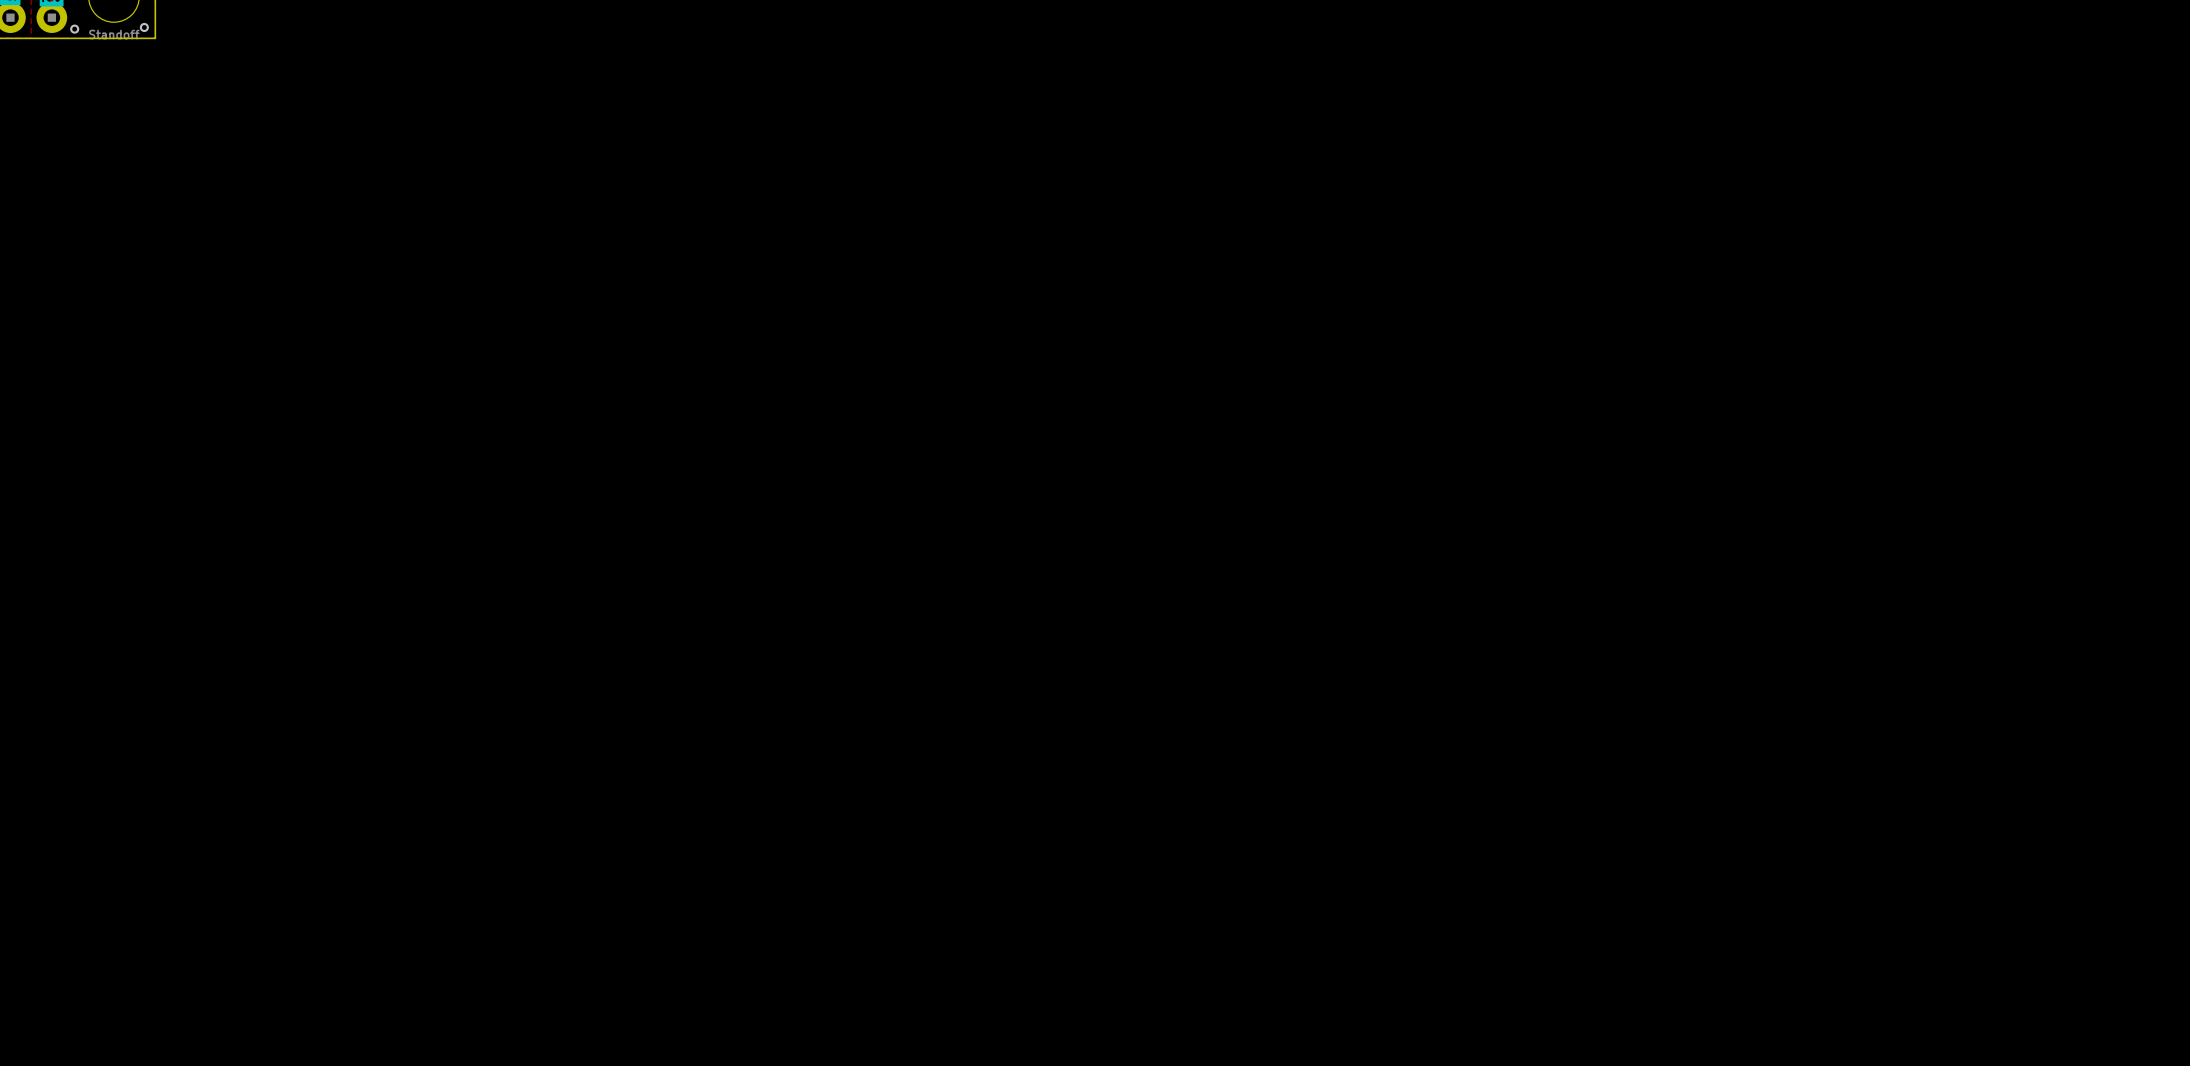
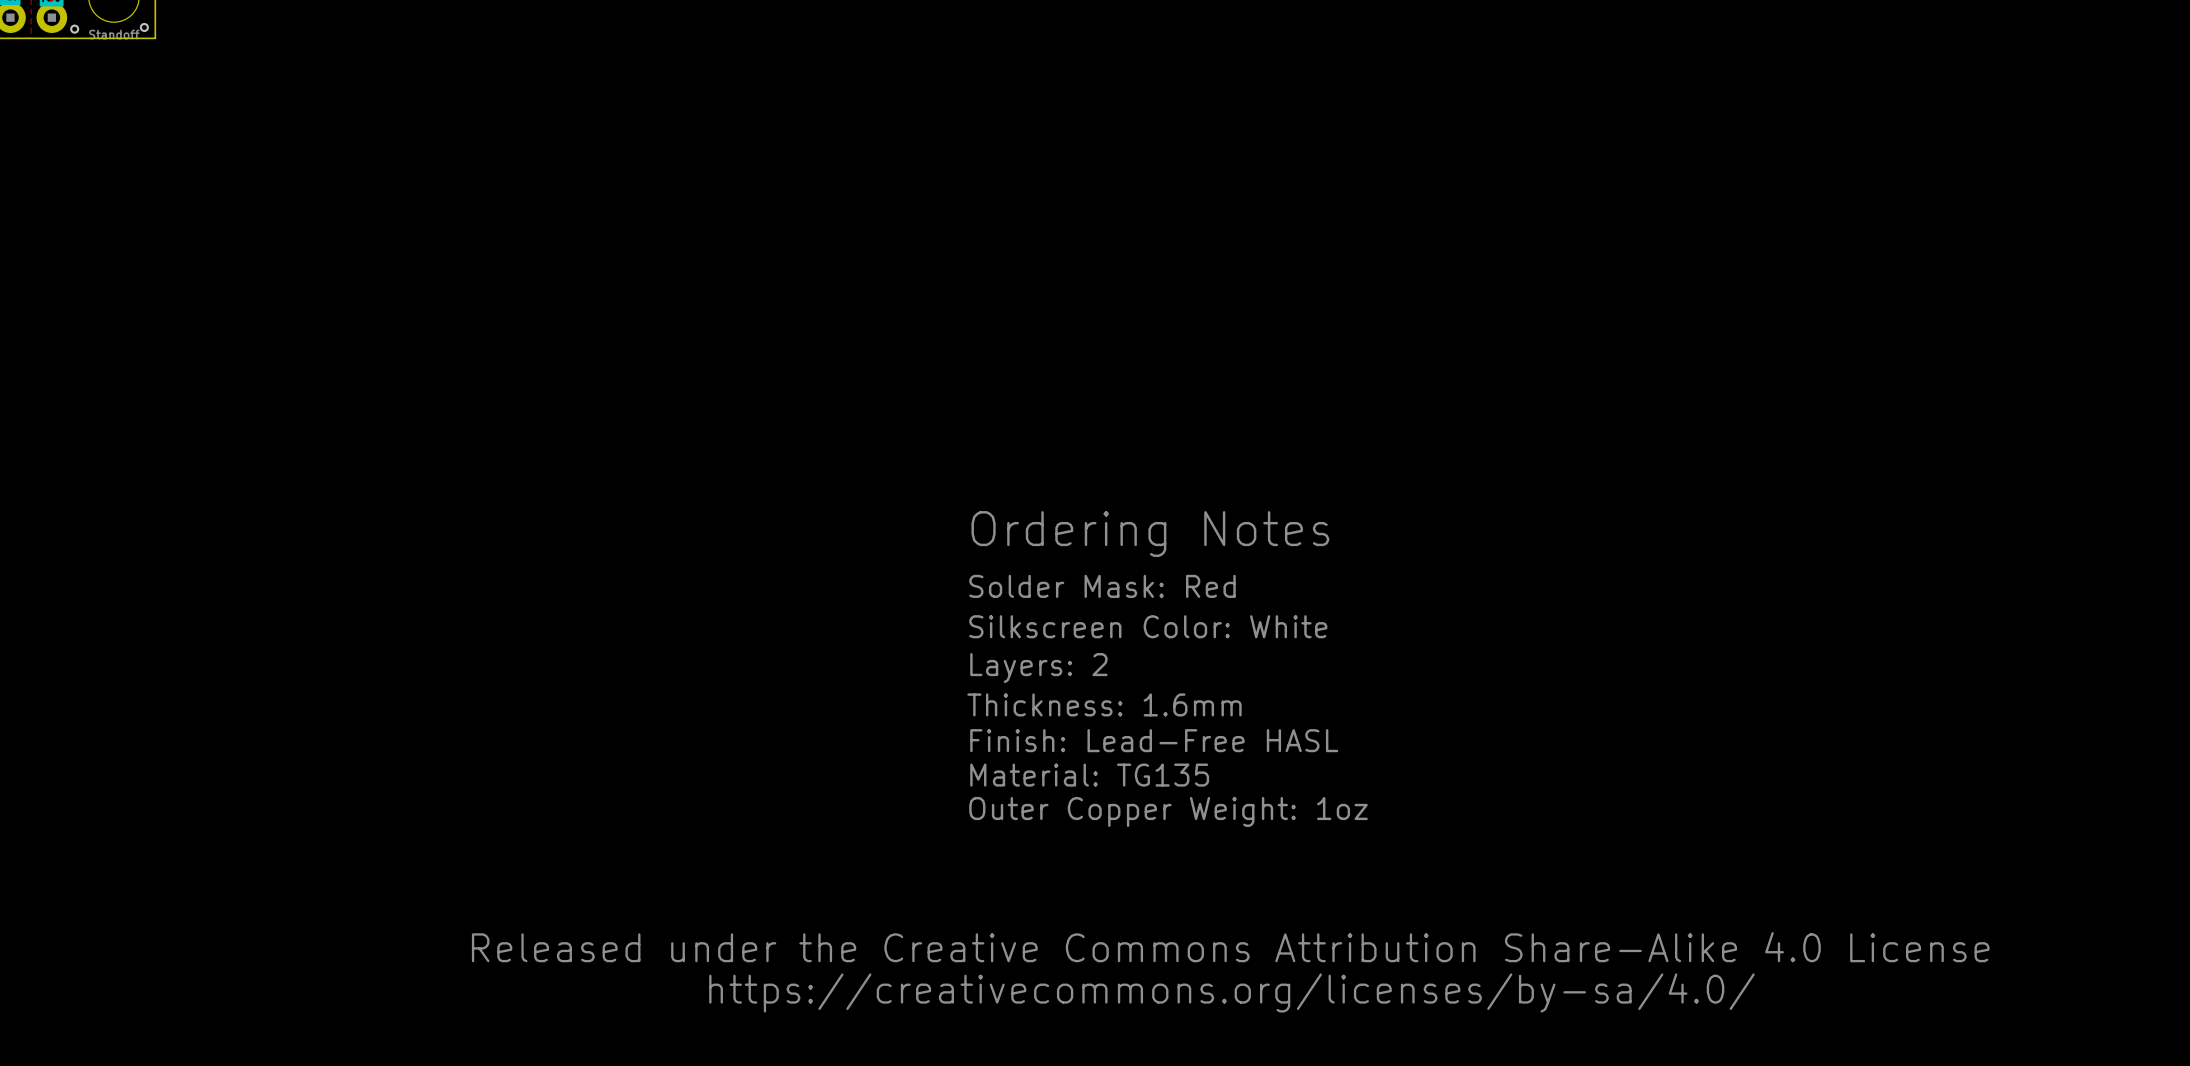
text: none -> Ordering Notes (1150, 534)
text: none -> Solder Mask: Red (1102, 586)
text: none -> Silkscreen Color: White (1148, 626)
text: none -> Layers: 2 (1038, 668)
text: none -> Thickness: 1.6mm (1104, 704)
text: none -> Finish: Lead-Free HASL (1154, 740)
text: none -> Material: TG135 (1089, 775)
text: none -> Outer Copper Weight: 1oz (1168, 811)
drawing: none -> [471, 932, 1990, 1013]

